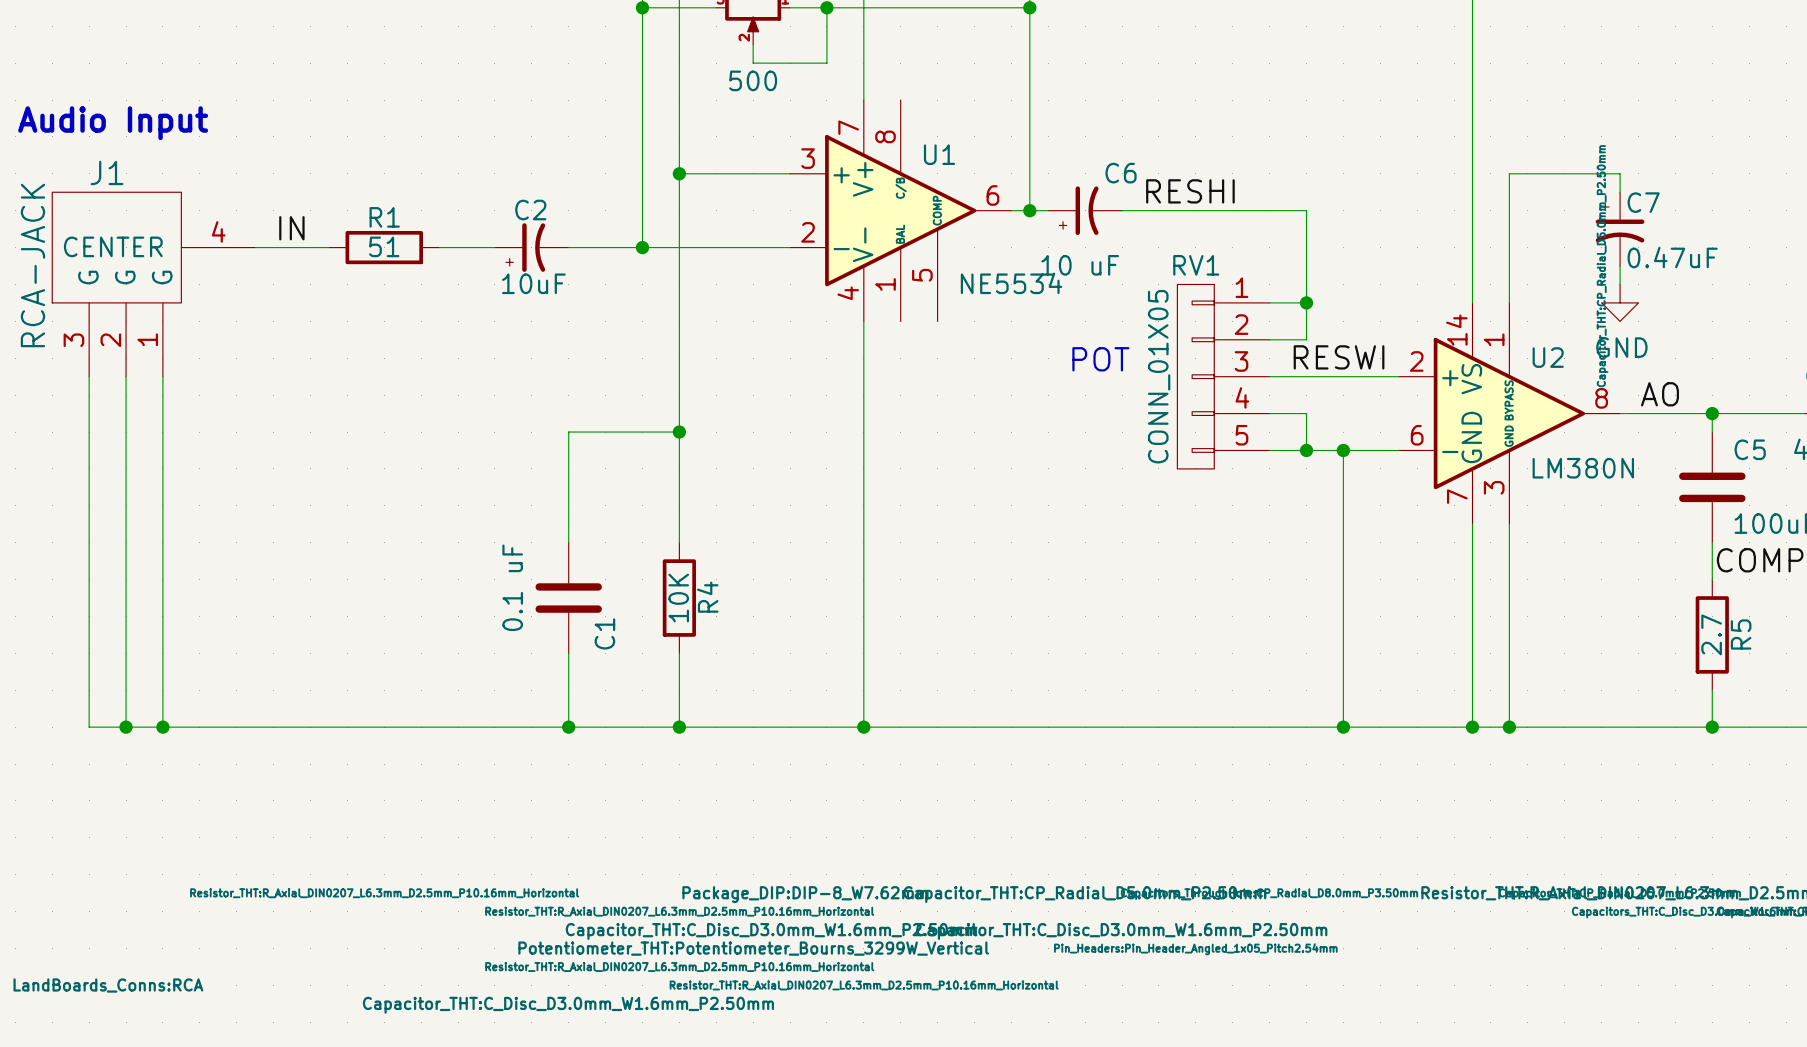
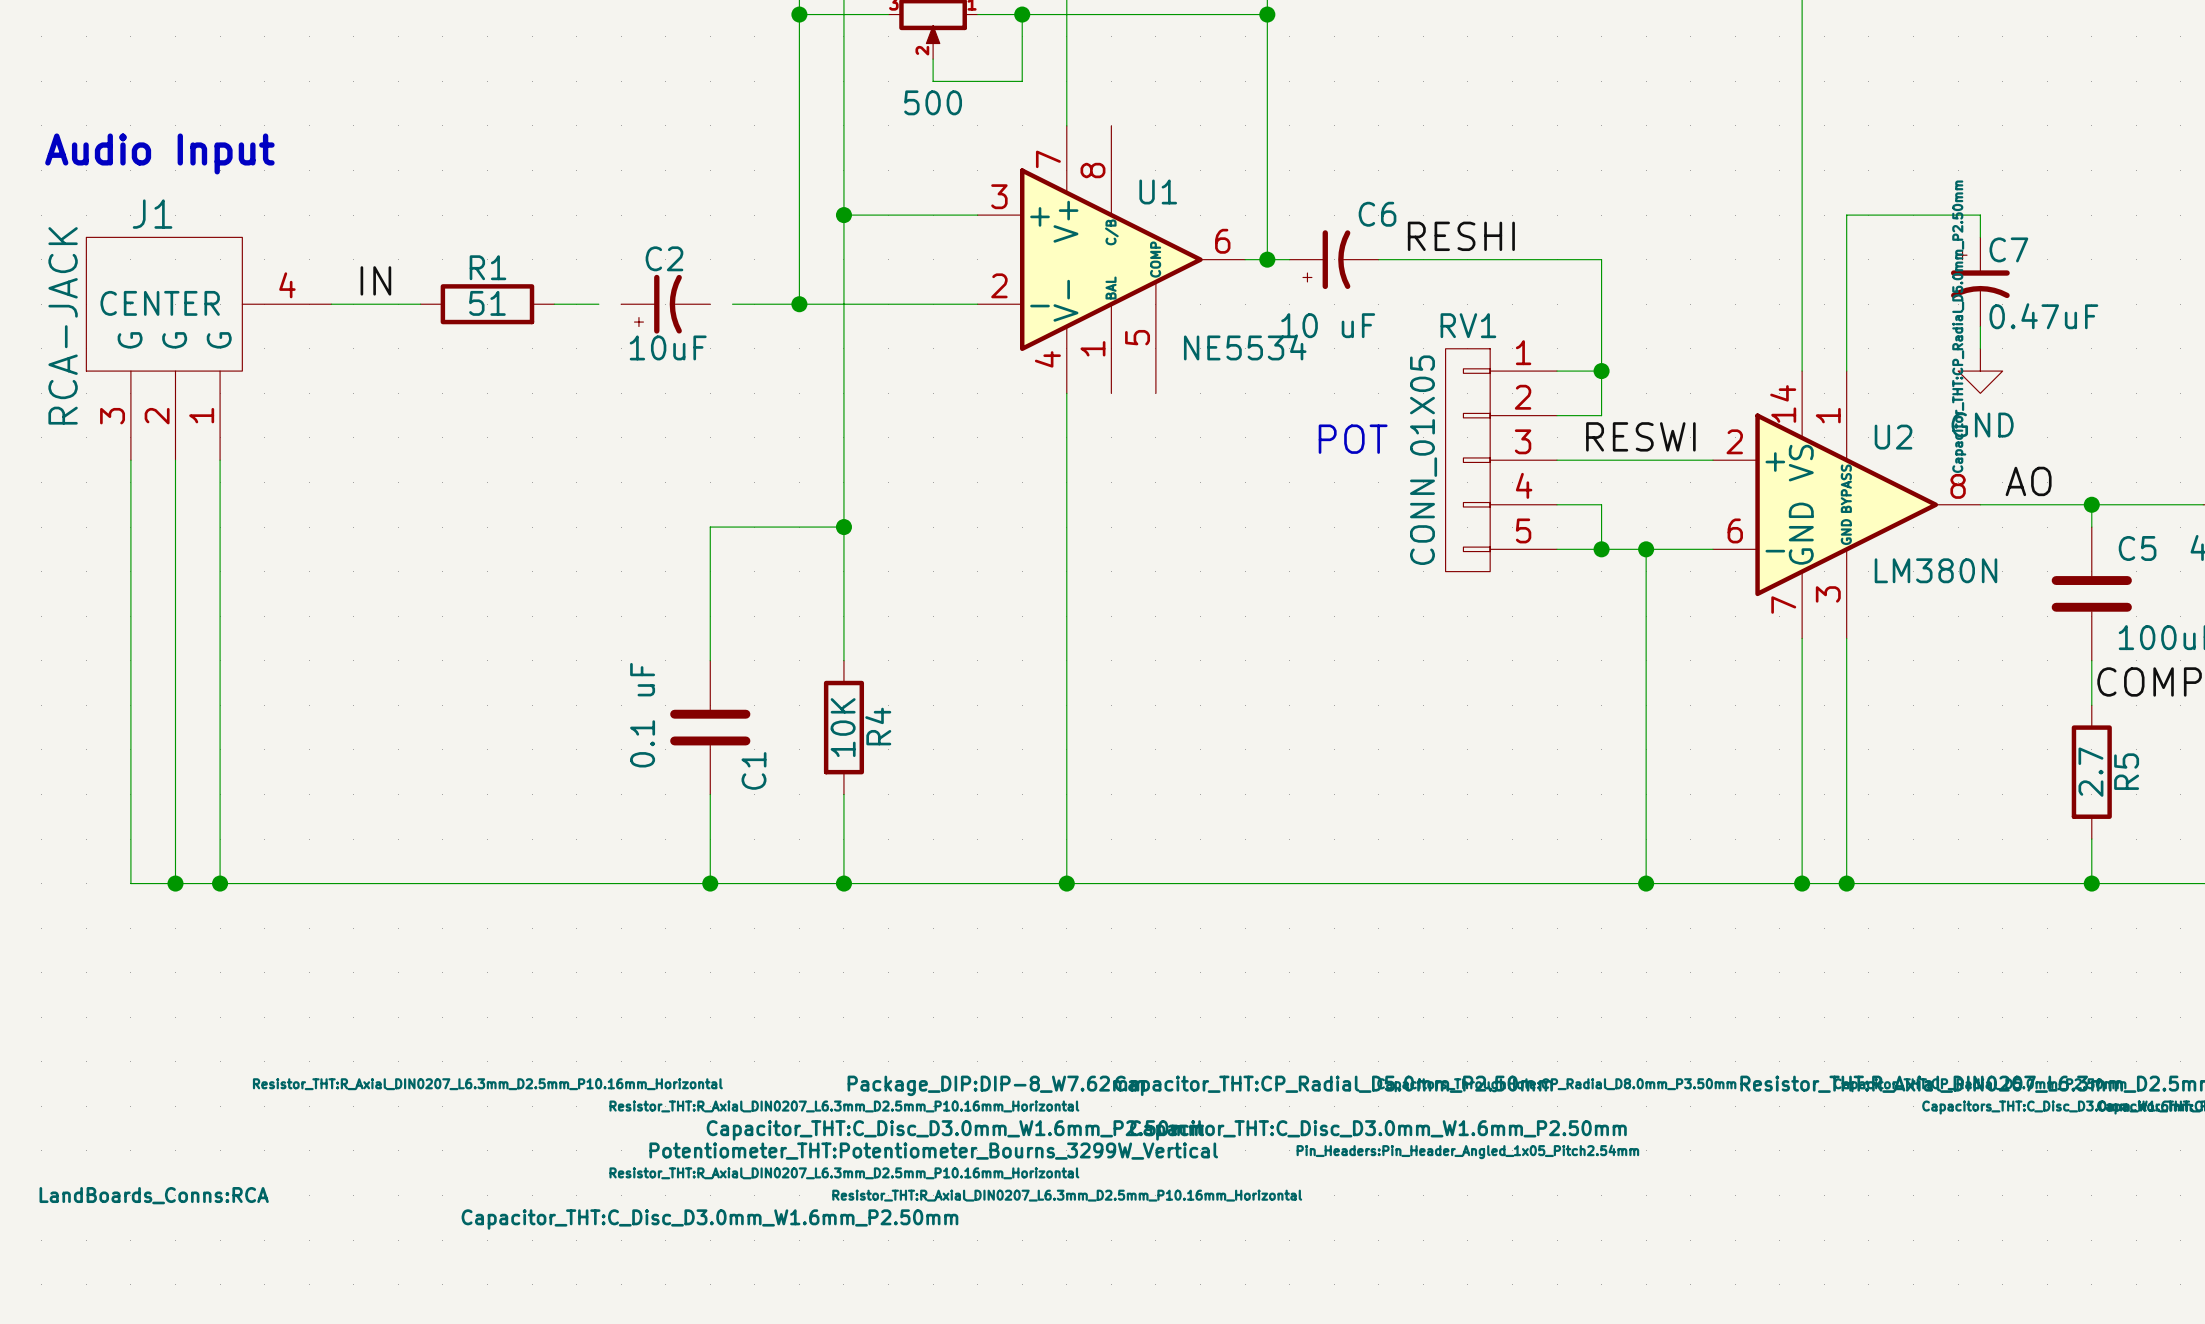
wire: (476, 247) (494, 247) -> none
wire: (568, 247) (587, 247) -> none

